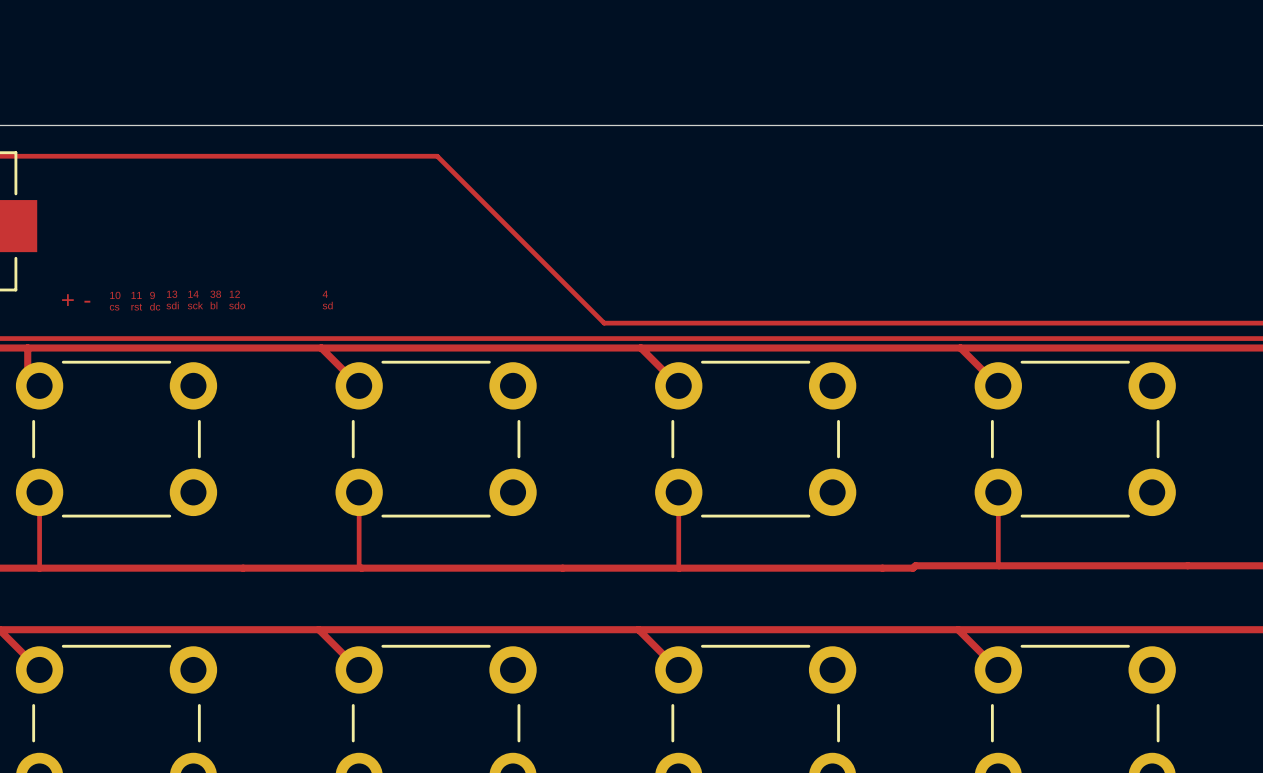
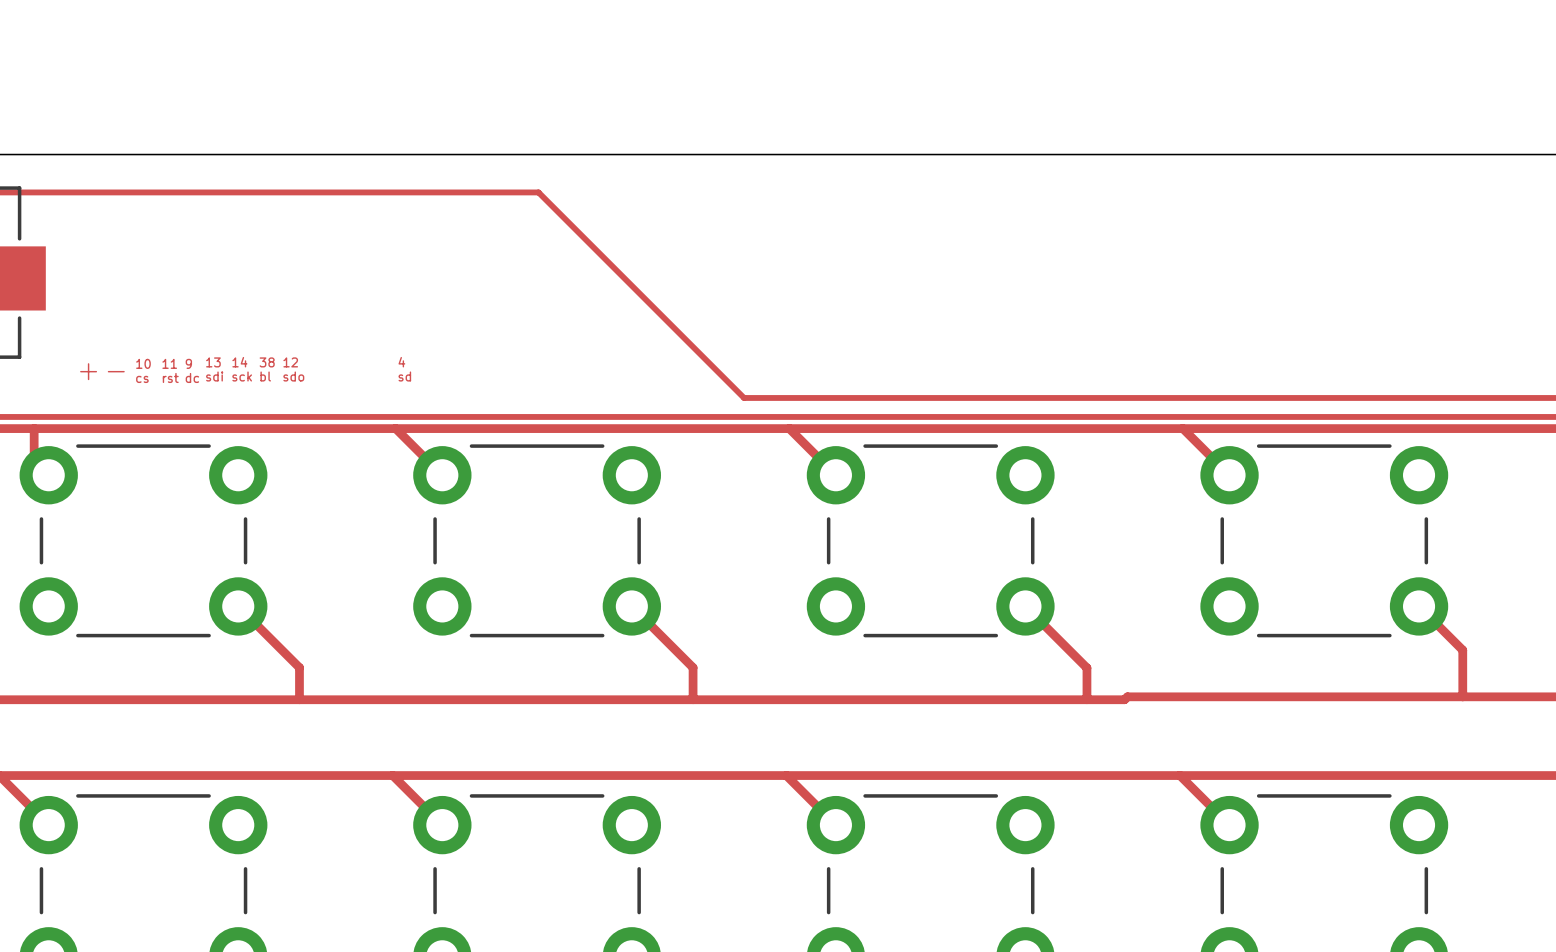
track: (39, 492) (39, 568) -> none
track: none -> (238, 606) (299, 667) (299, 699)
track: (359, 492) (359, 565) (361, 568) -> none
track: none -> (631, 606) (693, 667) (693, 699)
track: (678, 492) (679, 568) -> none
track: none -> (1025, 606) (1086, 667) (1086, 699)
track: (998, 492) (999, 565) -> none
track: none -> (1419, 606) (1462, 650) (1462, 696)

